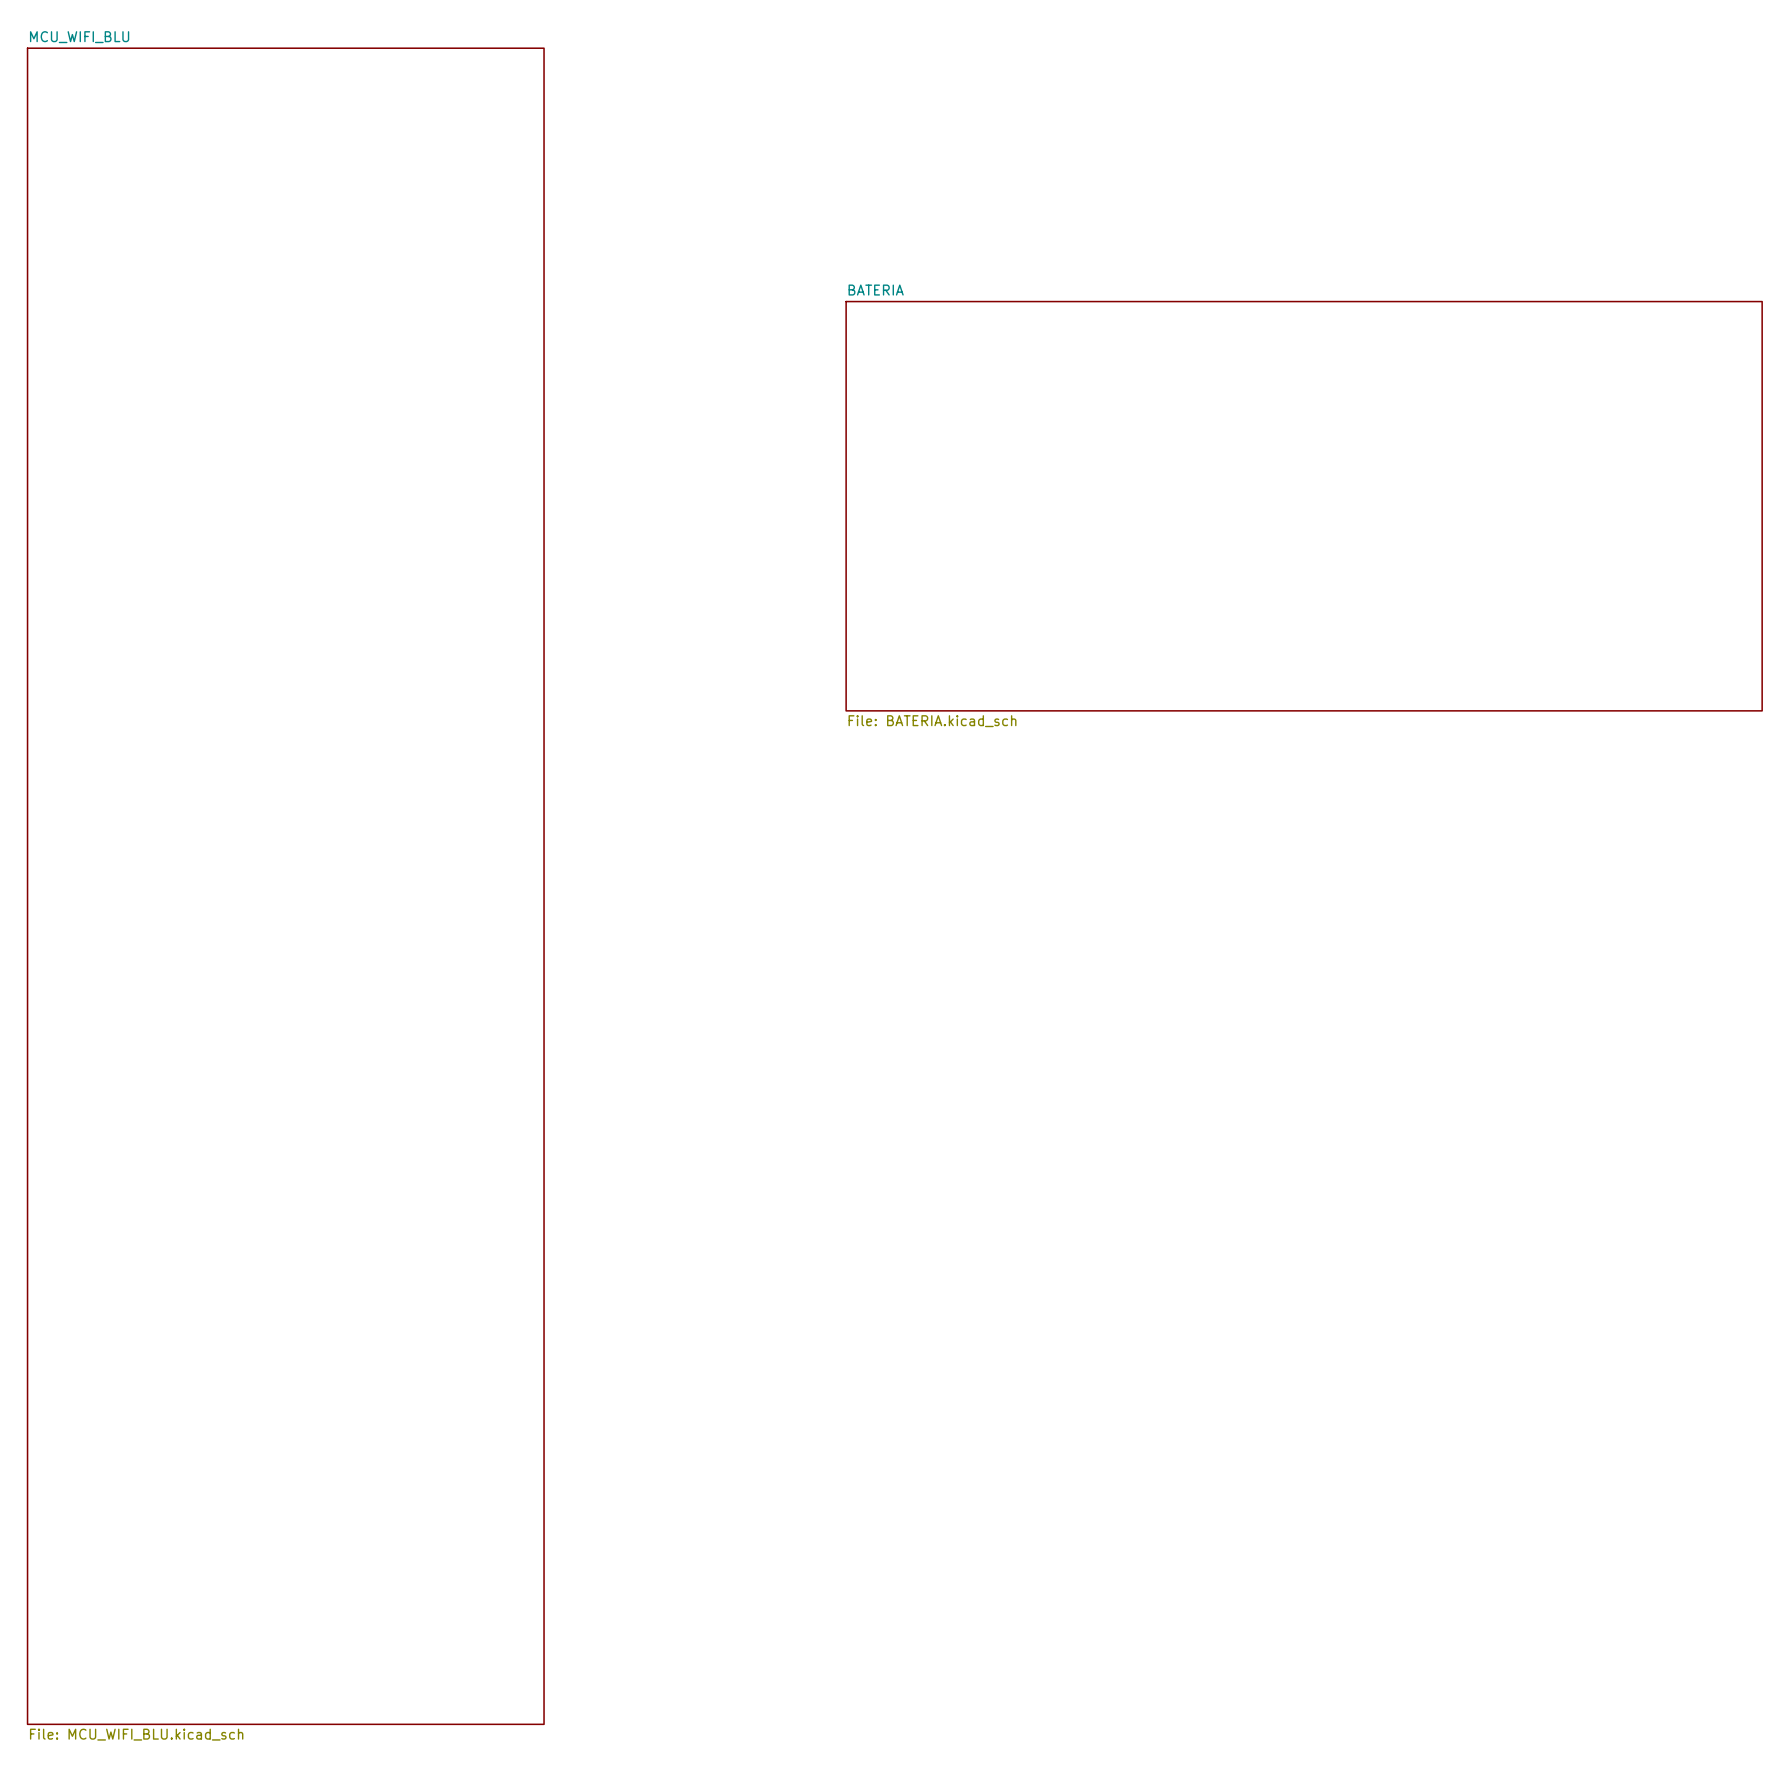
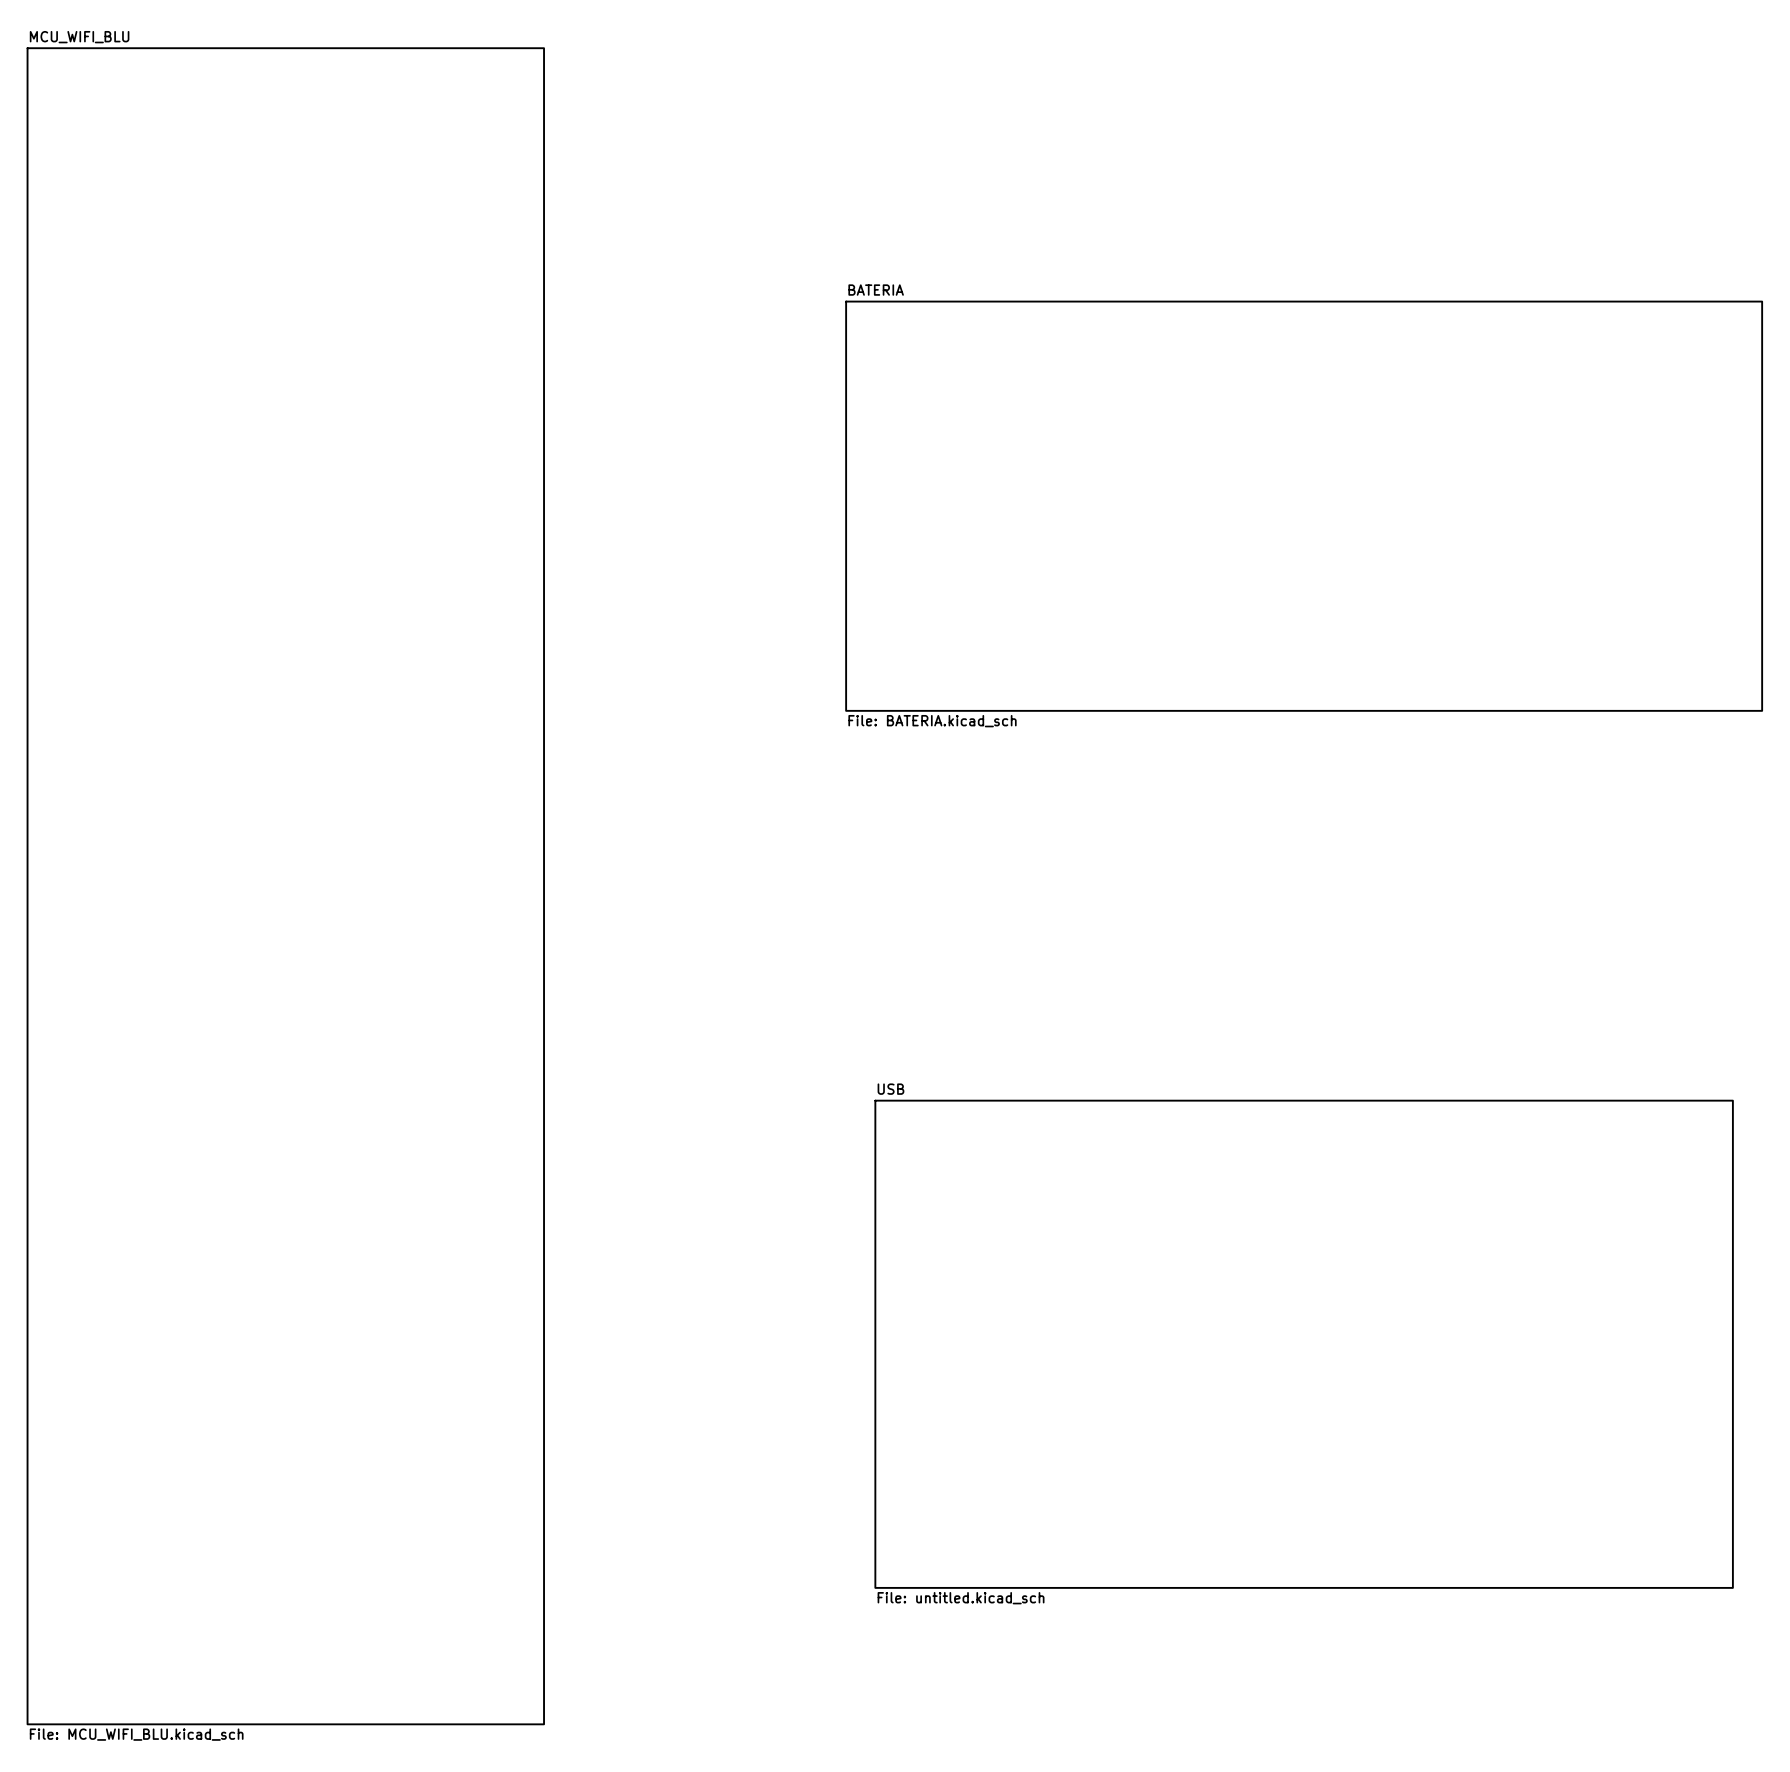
sheet USB: none -> File: untitled.kicad_sch (1304, 1344)

